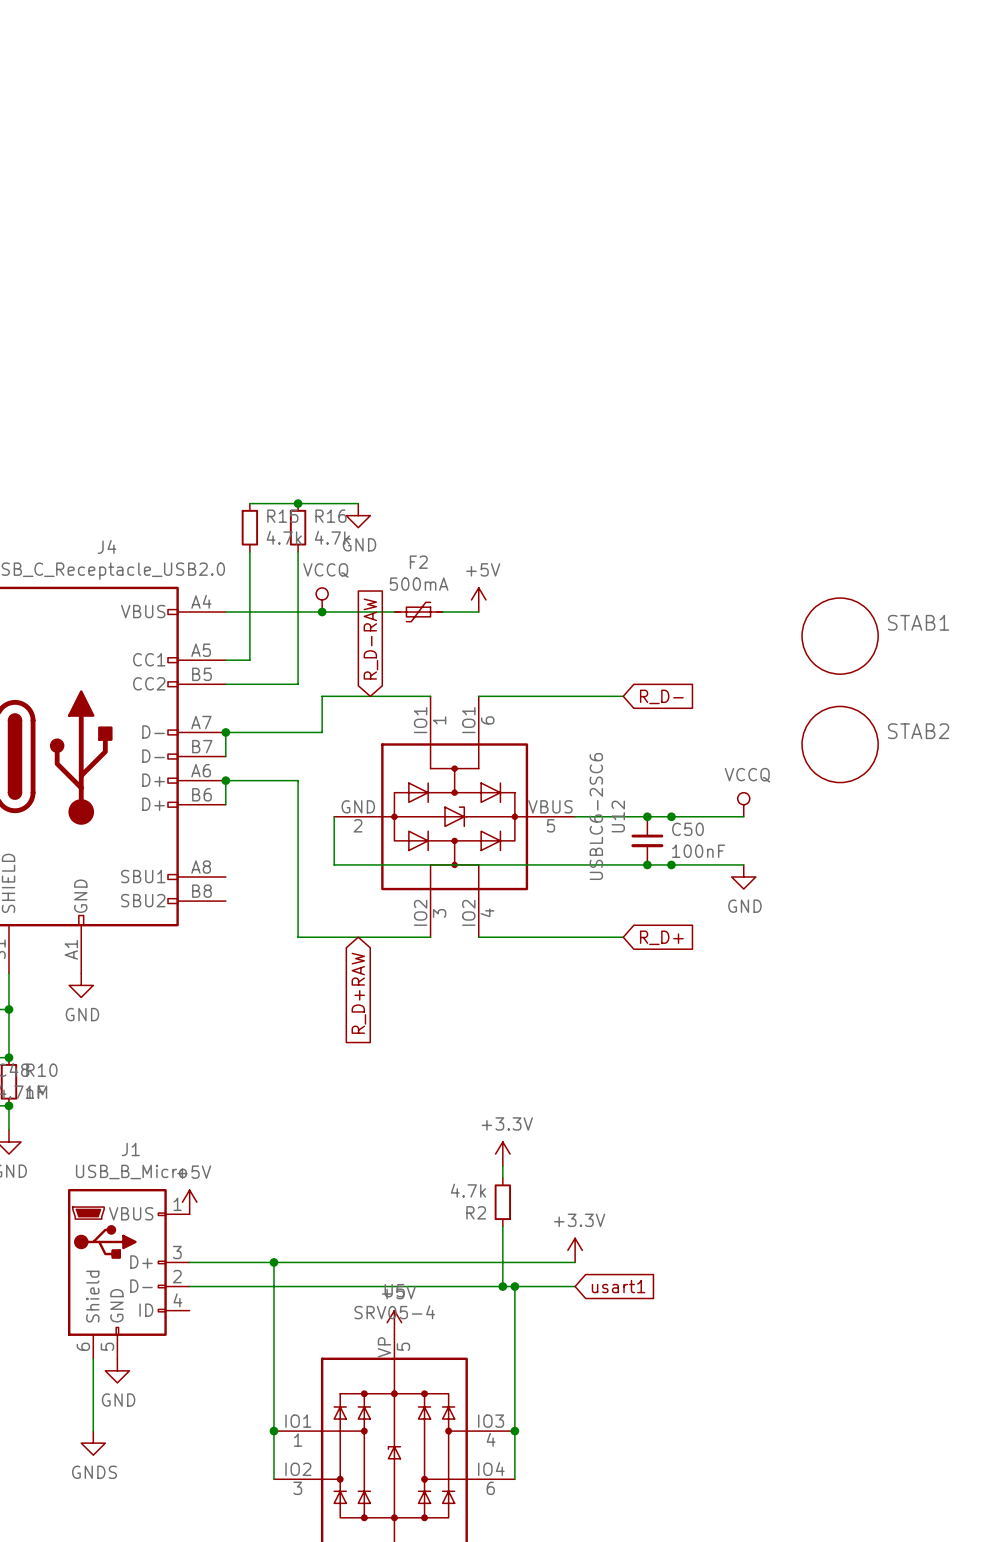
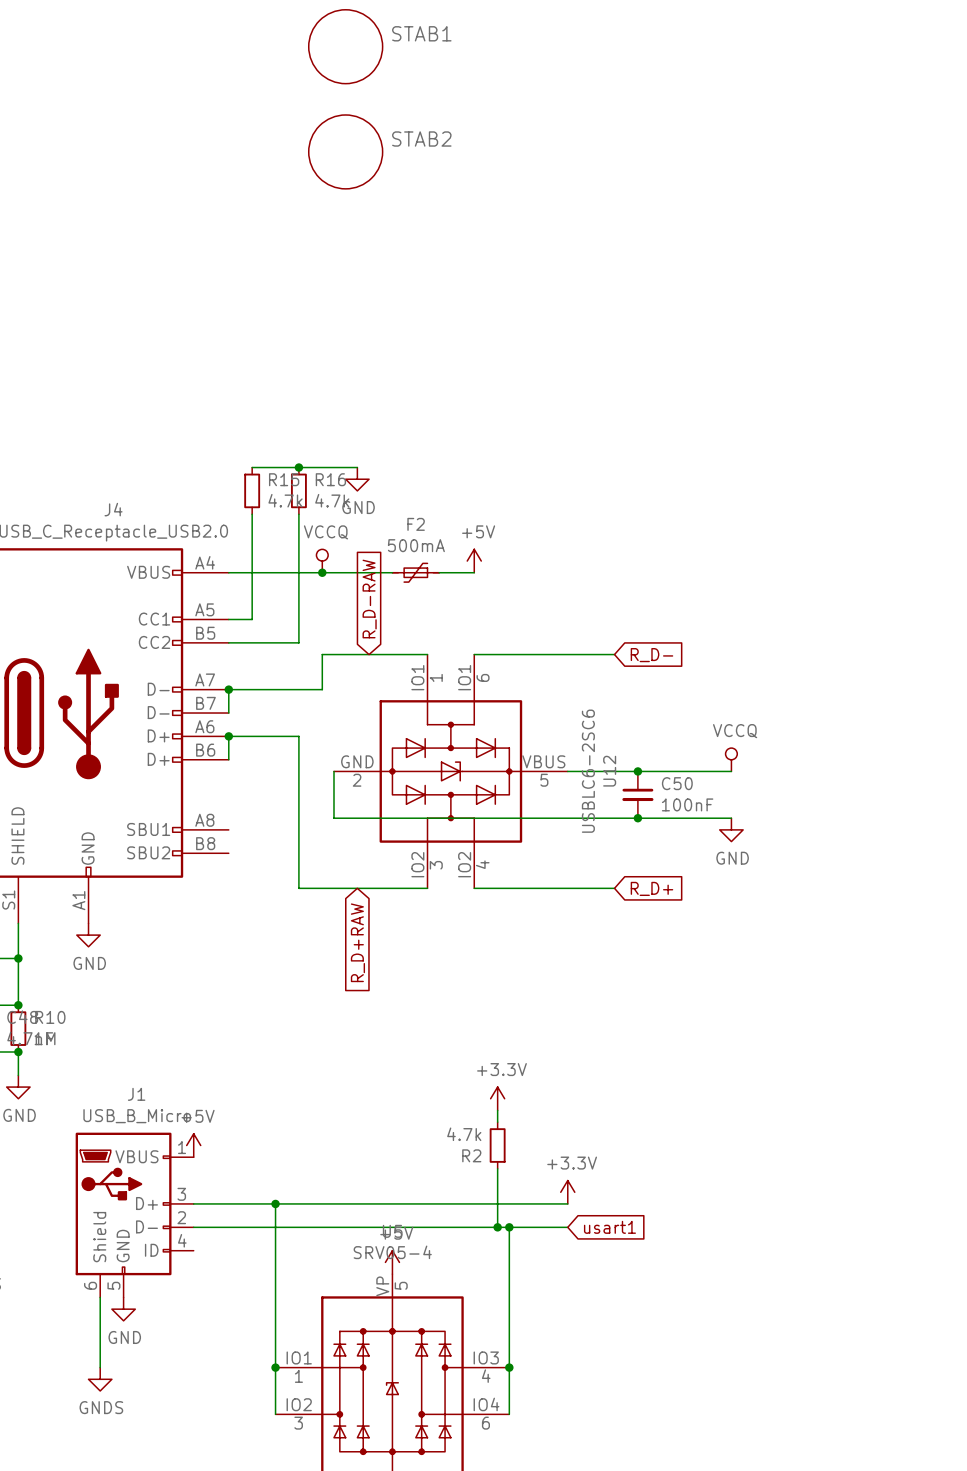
STAB1 position: (840, 636) -> (345, 46)
STAB2 position: (840, 744) -> (345, 151)
junction: (671, 816) -> none
junction: (671, 864) -> none

